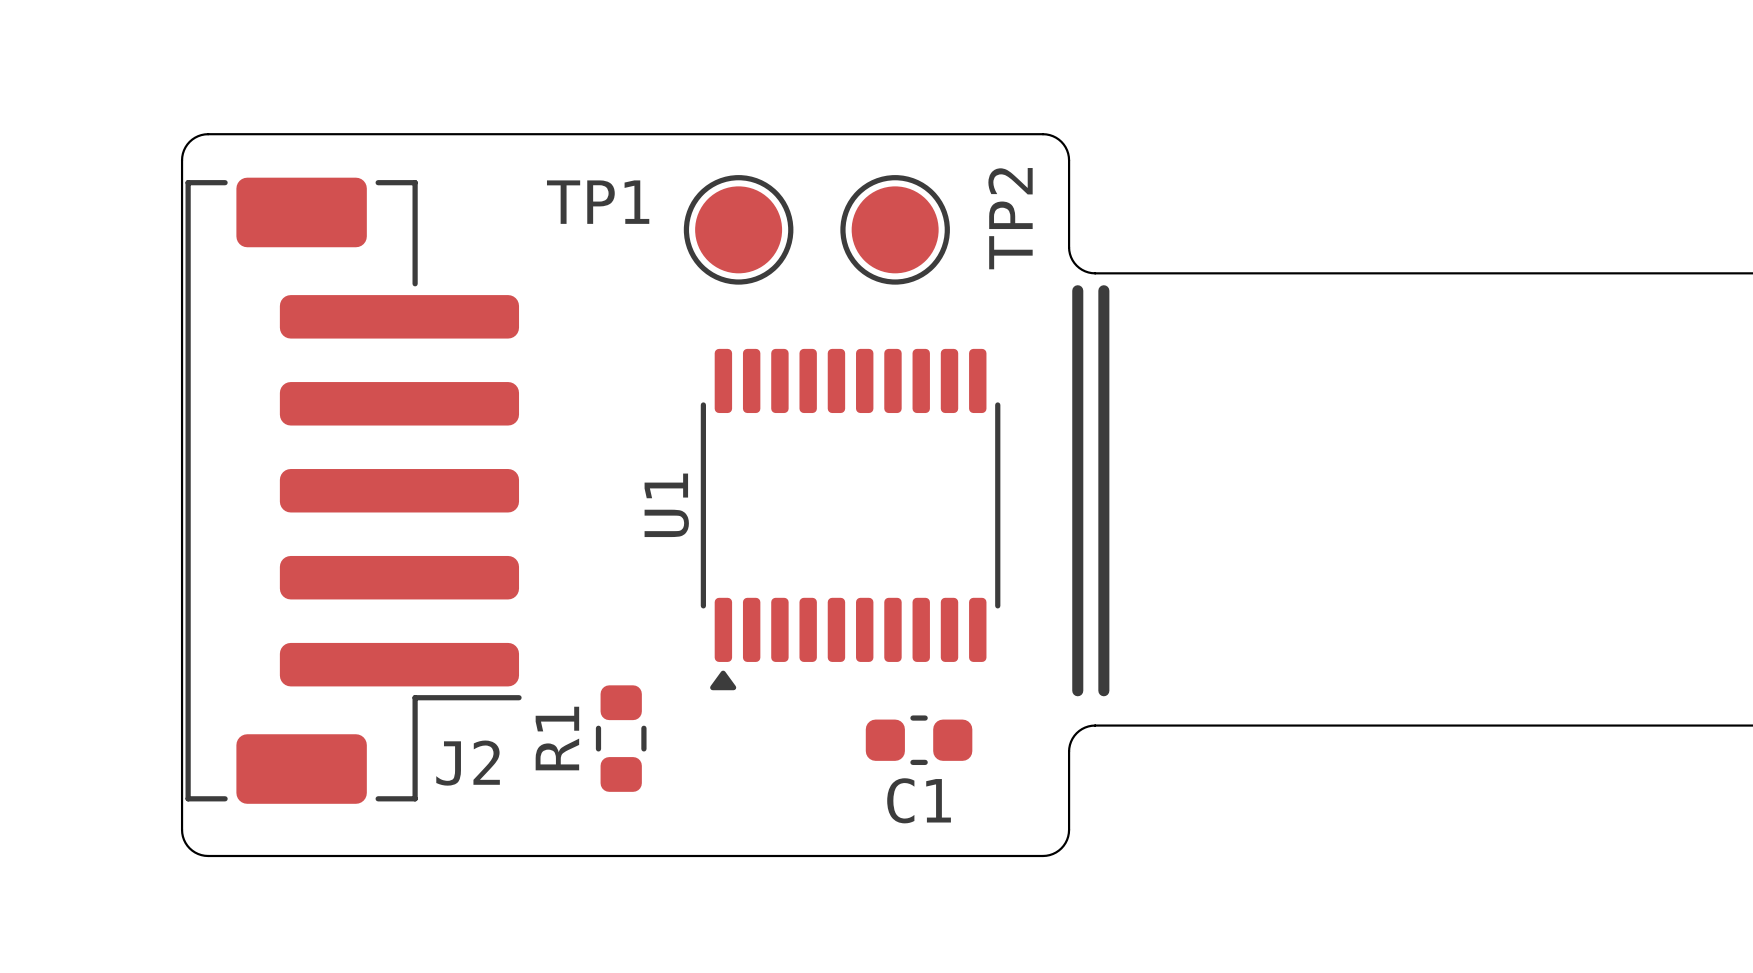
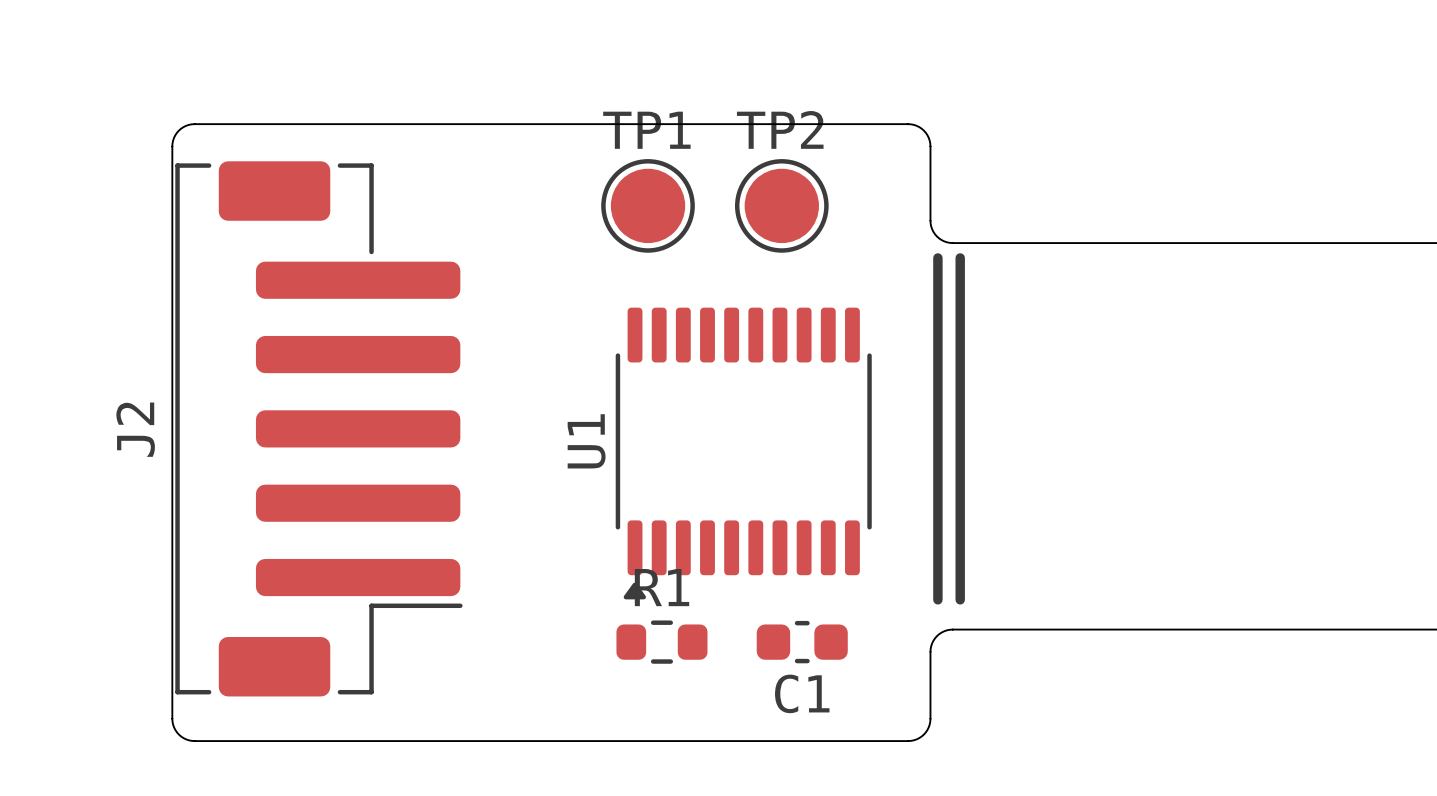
TP1 name position: TP1 (598, 202) -> TP1 (646, 130)
TP2 name rotation: 0° (1010, 218) -> 90° clockwise (780, 129)
R1 rotation: 0° (621, 738) -> 90° clockwise (661, 642)
R1 position: (621, 738) -> (661, 642)
J2 name rotation: 0° (468, 763) -> 90° counterclockwise (135, 429)
J2 name position: J2 (468, 763) -> J2 (135, 429)

